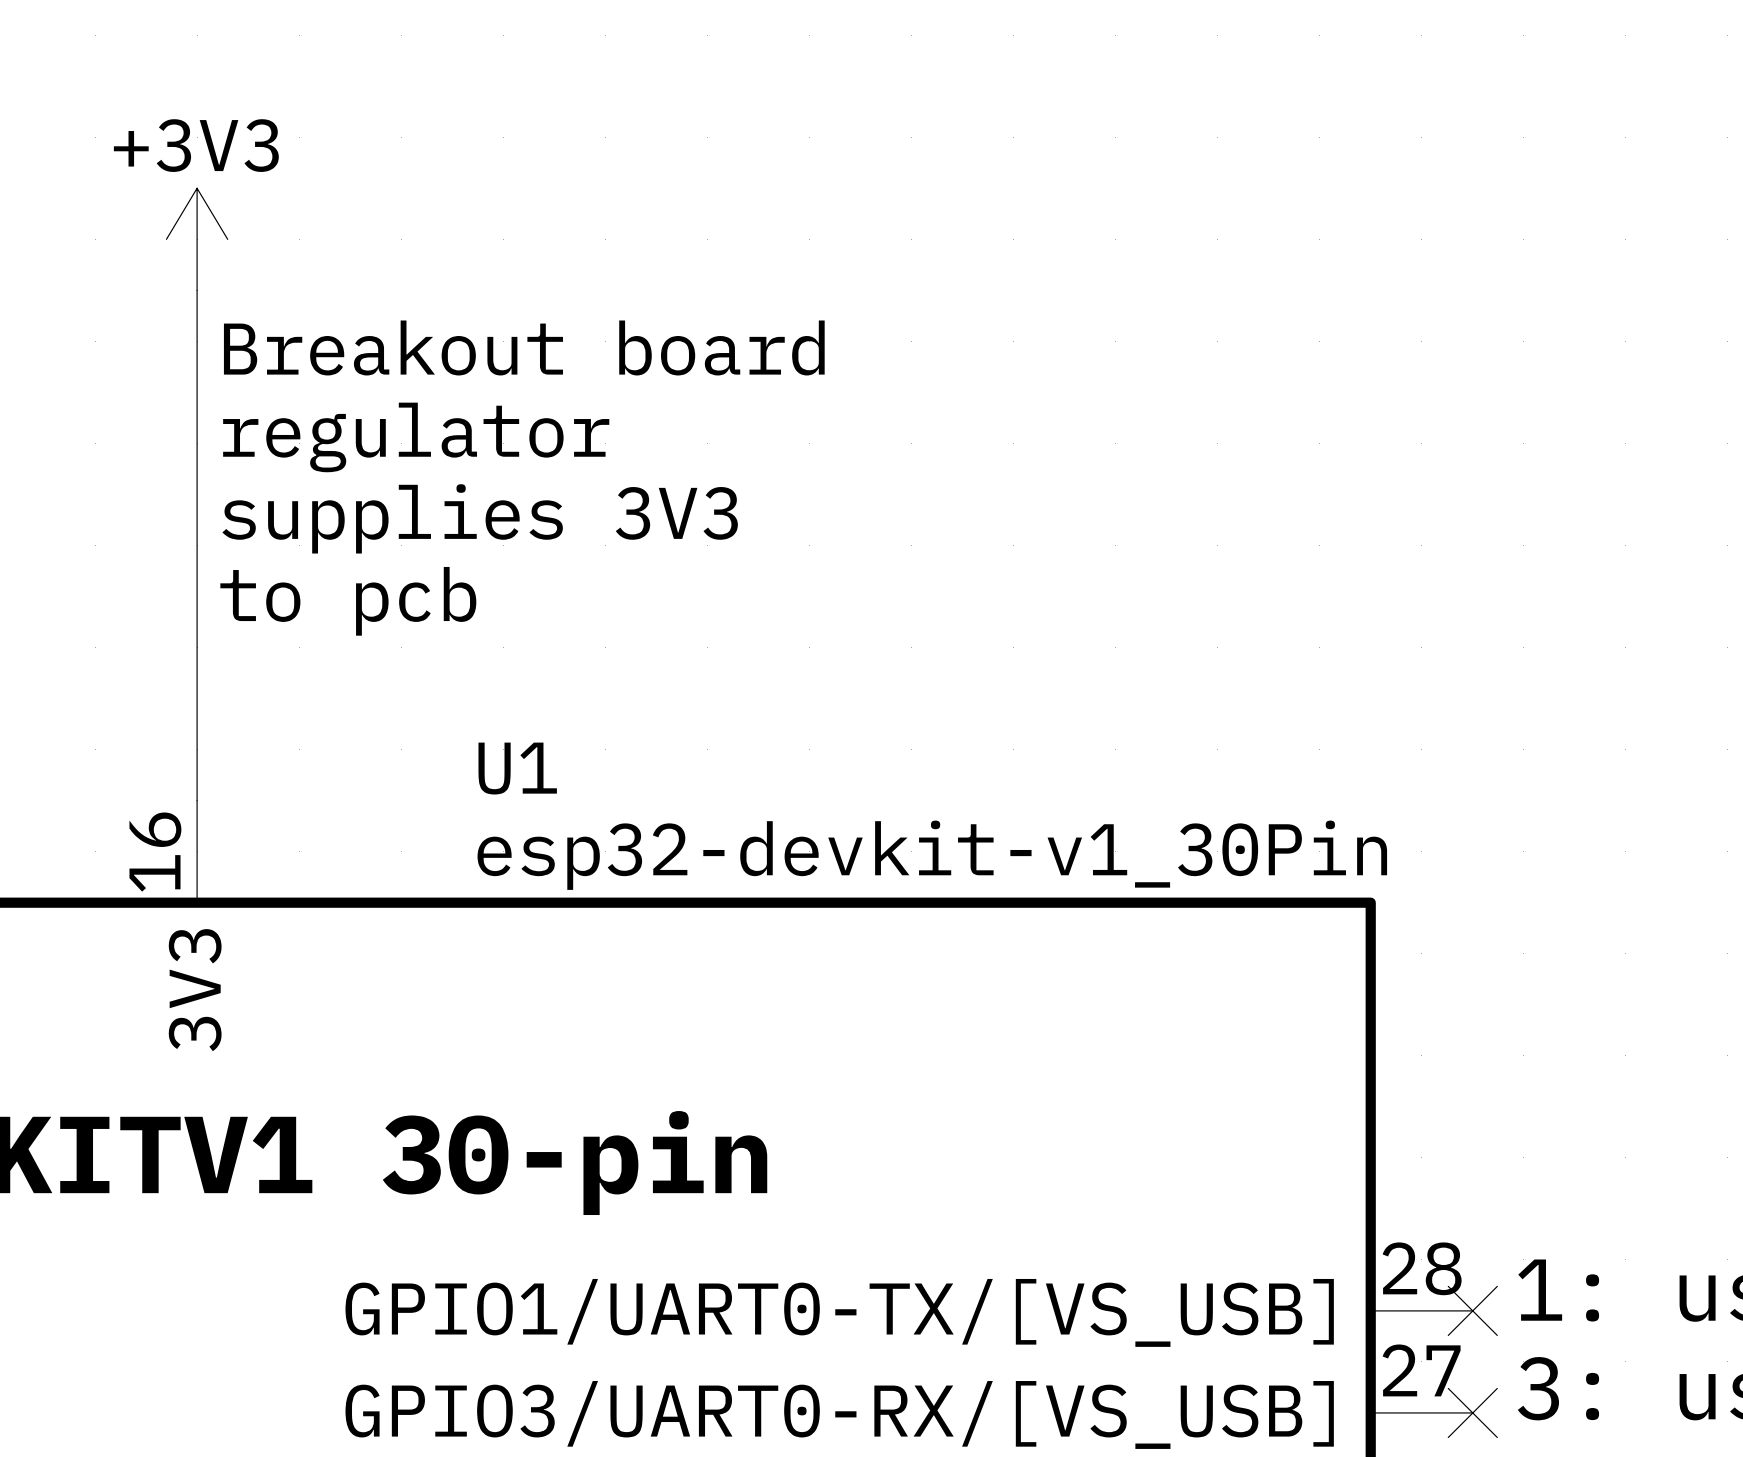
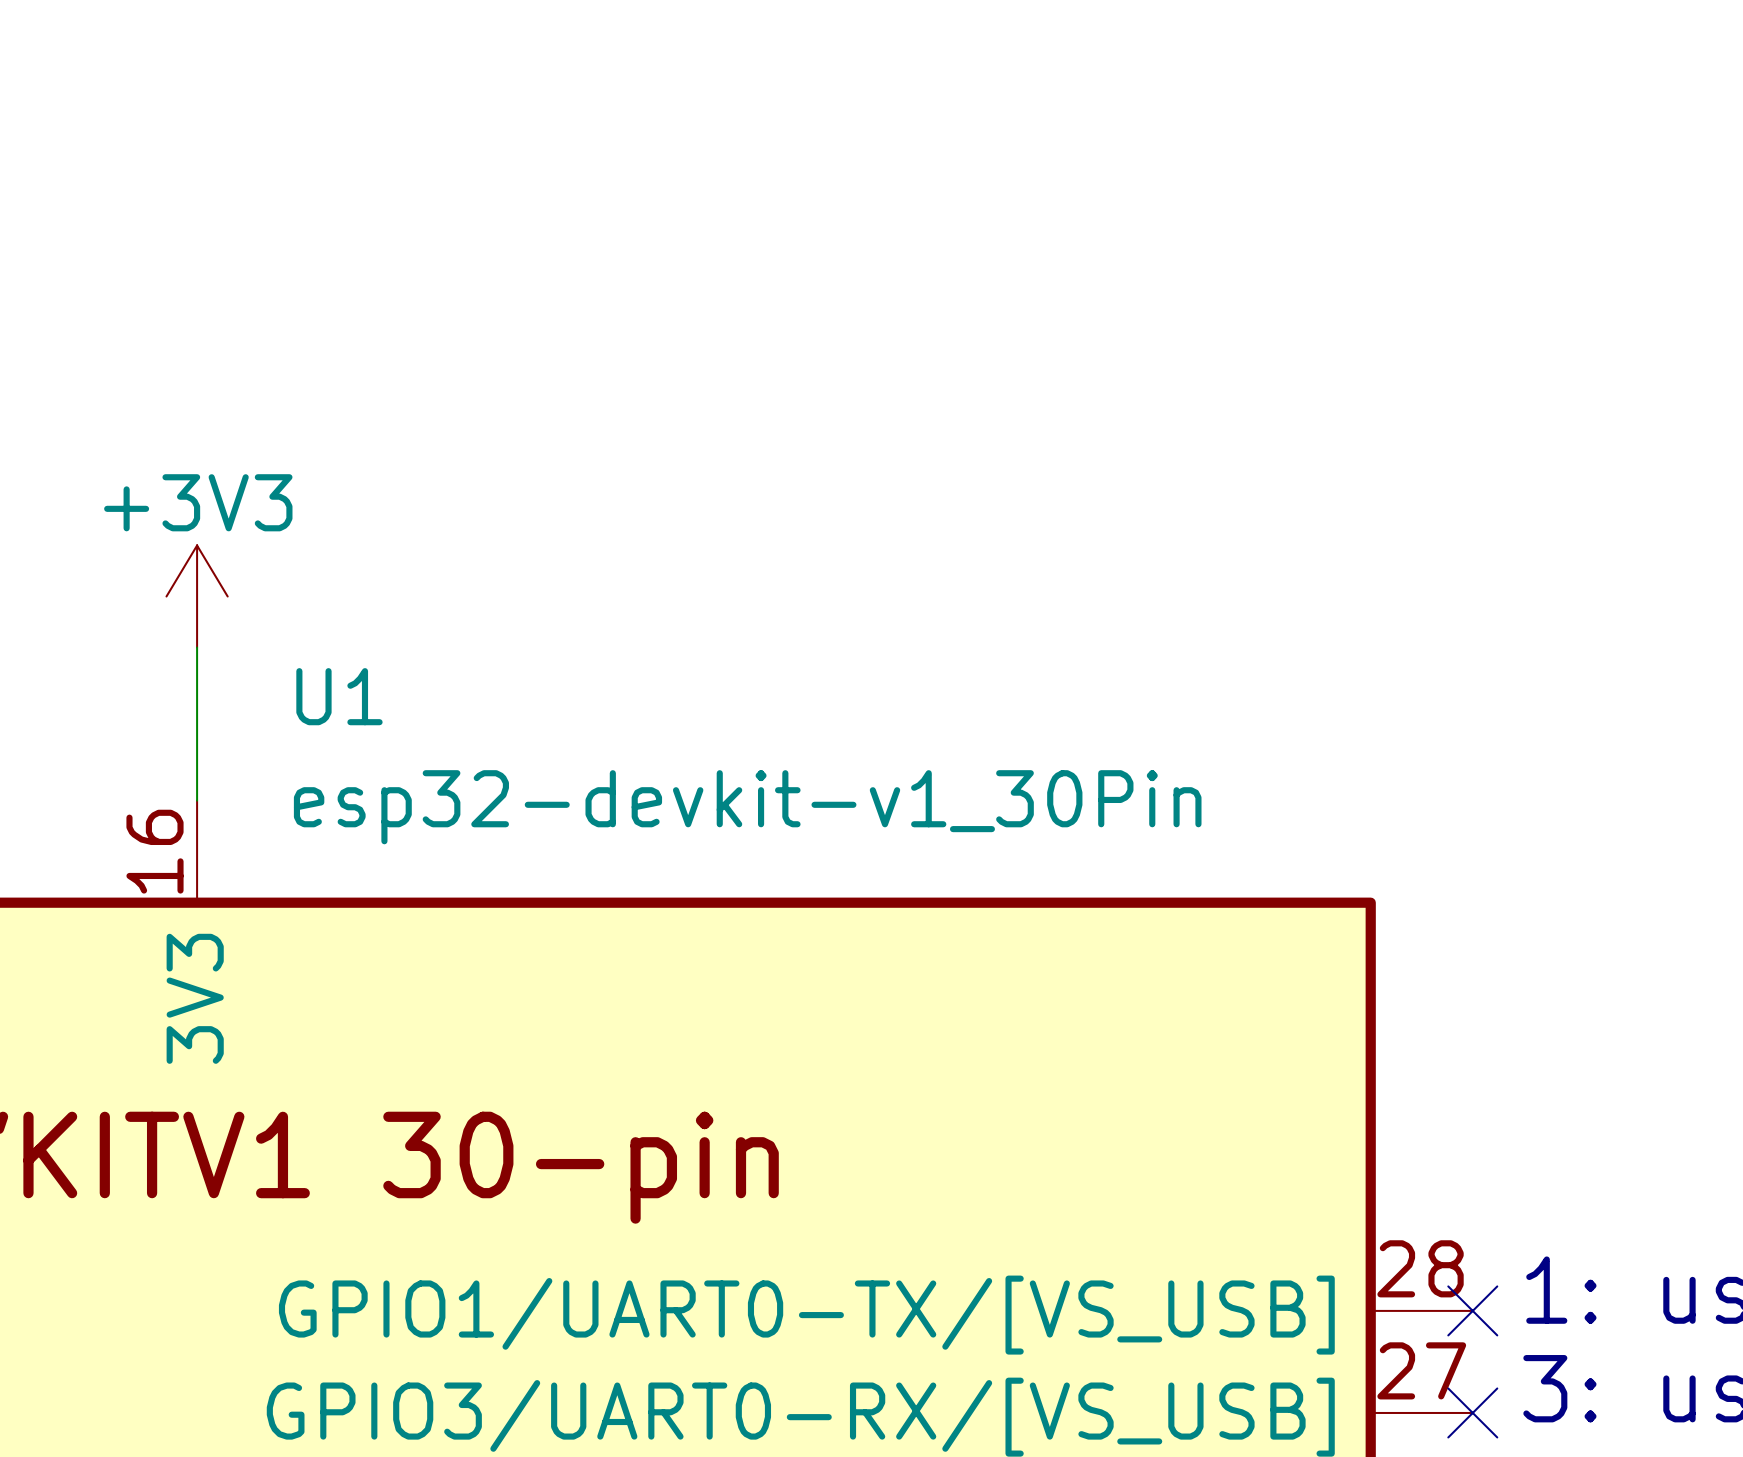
power symbol position: +3V3 (197, 239) -> +3V3 (197, 596)
wire: (197, 290) (197, 647) -> none
text: Breakout board (524, 347) -> none
text: regulator (416, 437) -> none
text: supplies 3V3 (480, 518) -> none
text: to pcb (348, 601) -> none
U1 name position: U1 (517, 768) -> U1 (339, 696)
U1 value position: esp32-devkit-v1_30Pin (932, 855) -> esp32-devkit-v1_30Pin (747, 807)

